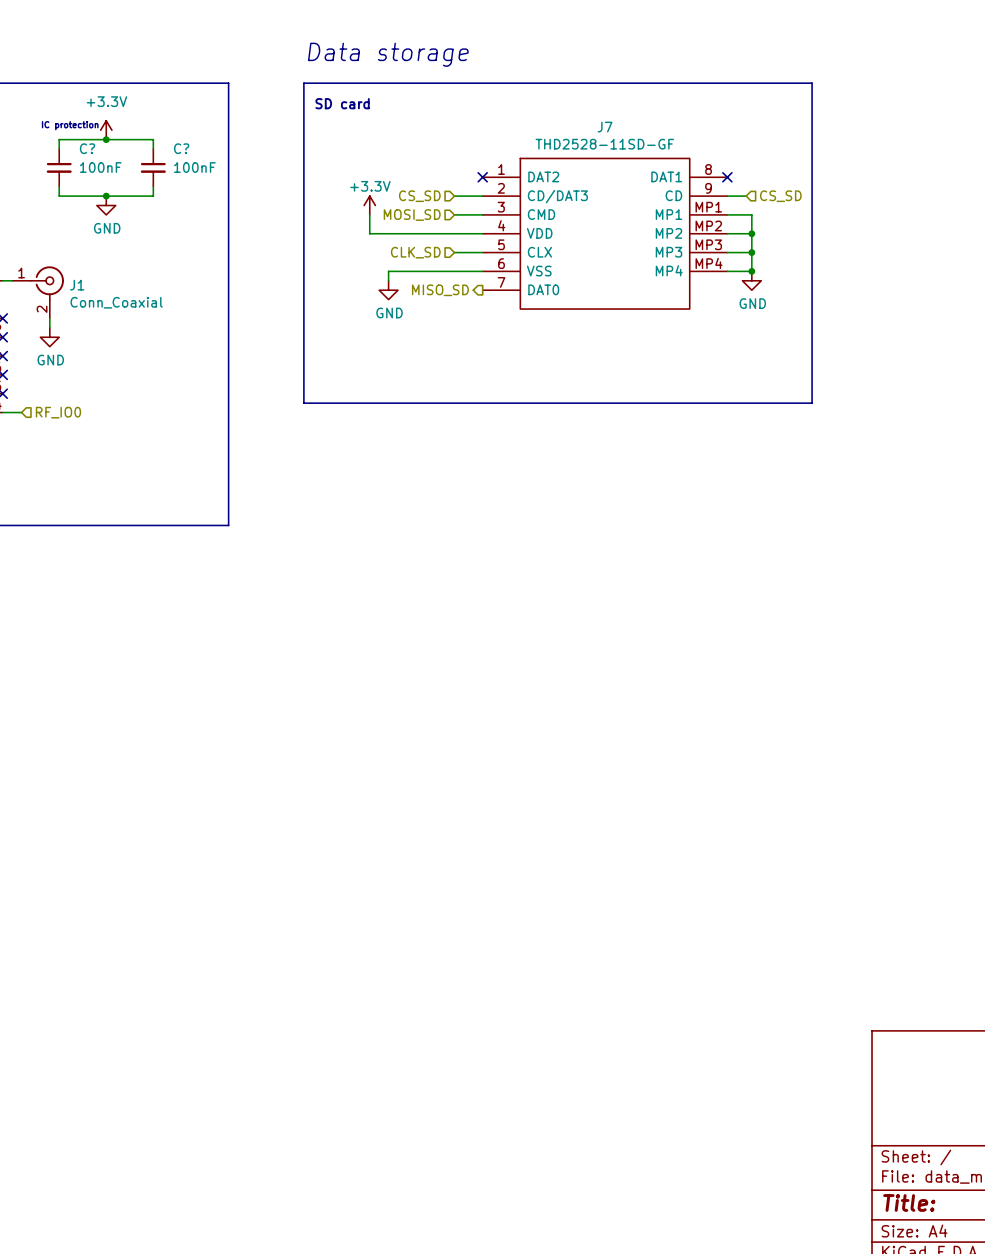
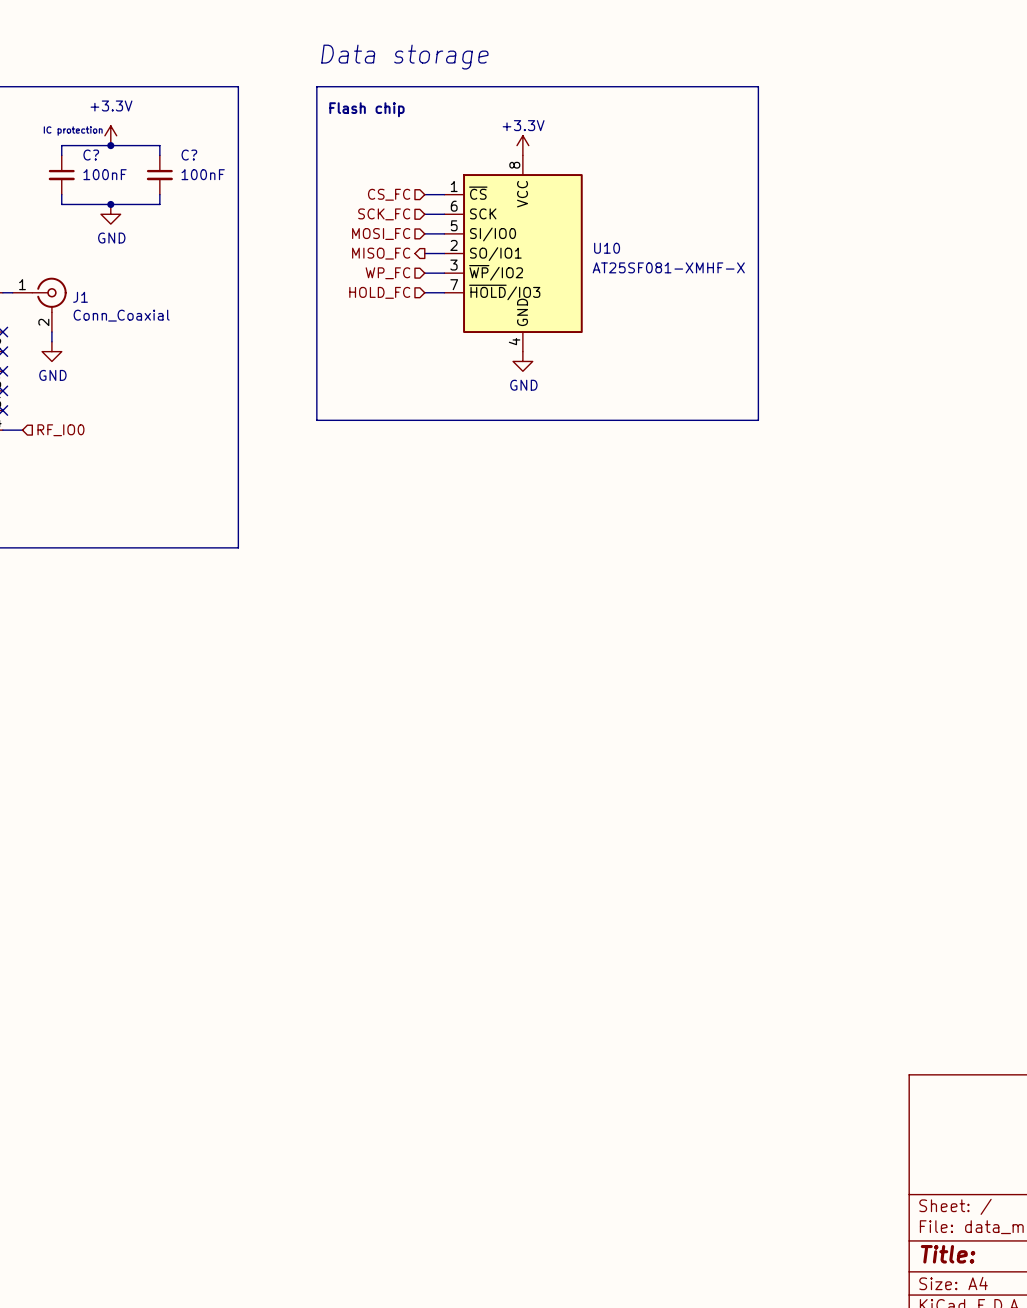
line: (727, 83) (812, 83) (812, 403) (727, 403) -> (758, 86) (758, 420)
text: SD card (342, 103) -> Flash chip (366, 109)
no-connect mark: (482, 177) -> none
no-connect mark: (727, 177) -> none
hierarchical label: none -> CS_FC (389, 194)
wire: none -> (424, 194) (444, 194)
hierarchical label: CS_SD (419, 196) -> none
wire: (727, 196) (746, 196) -> none
hierarchical label: CS_SD (780, 196) -> none
hierarchical label: none -> SCK_FC (384, 214)
power symbol position: +3.3V (369, 205) -> +3.3V (522, 145)
wire: none -> (424, 214) (444, 214)
wire: (369, 214) (369, 233) (482, 233) -> none
wire: (727, 214) (751, 214) (751, 271) (727, 271) -> none
hierarchical label: MOSI_SD (412, 215) -> MOSI_FC (381, 234)
wire: none -> (424, 233) (444, 233)
J7: THD2528-11SD-GF (605, 233) -> none
wire: (727, 233) (751, 233) -> none
junction: (751, 233) -> none
hierarchical label: none -> MISO_FC (381, 253)
wire: none -> (424, 253) (444, 253)
U10: none -> AT25SF081-XMHF-X (513, 253)
hierarchical label: CLK_SD (415, 252) -> none
wire: (727, 252) (751, 252) -> none
junction: (751, 252) -> none
wire: none -> (424, 273) (444, 273)
hierarchical label: none -> WP_FC (387, 273)
wire: (482, 271) (388, 271) (388, 280) -> none
junction: (751, 271) -> none
hierarchical label: none -> HOLD_FC (379, 292)
wire: none -> (424, 292) (444, 292)
power symbol: GND (751, 280) -> none
power symbol position: GND (388, 290) -> GND (522, 361)
hierarchical label: MISO_SD (440, 290) -> none

